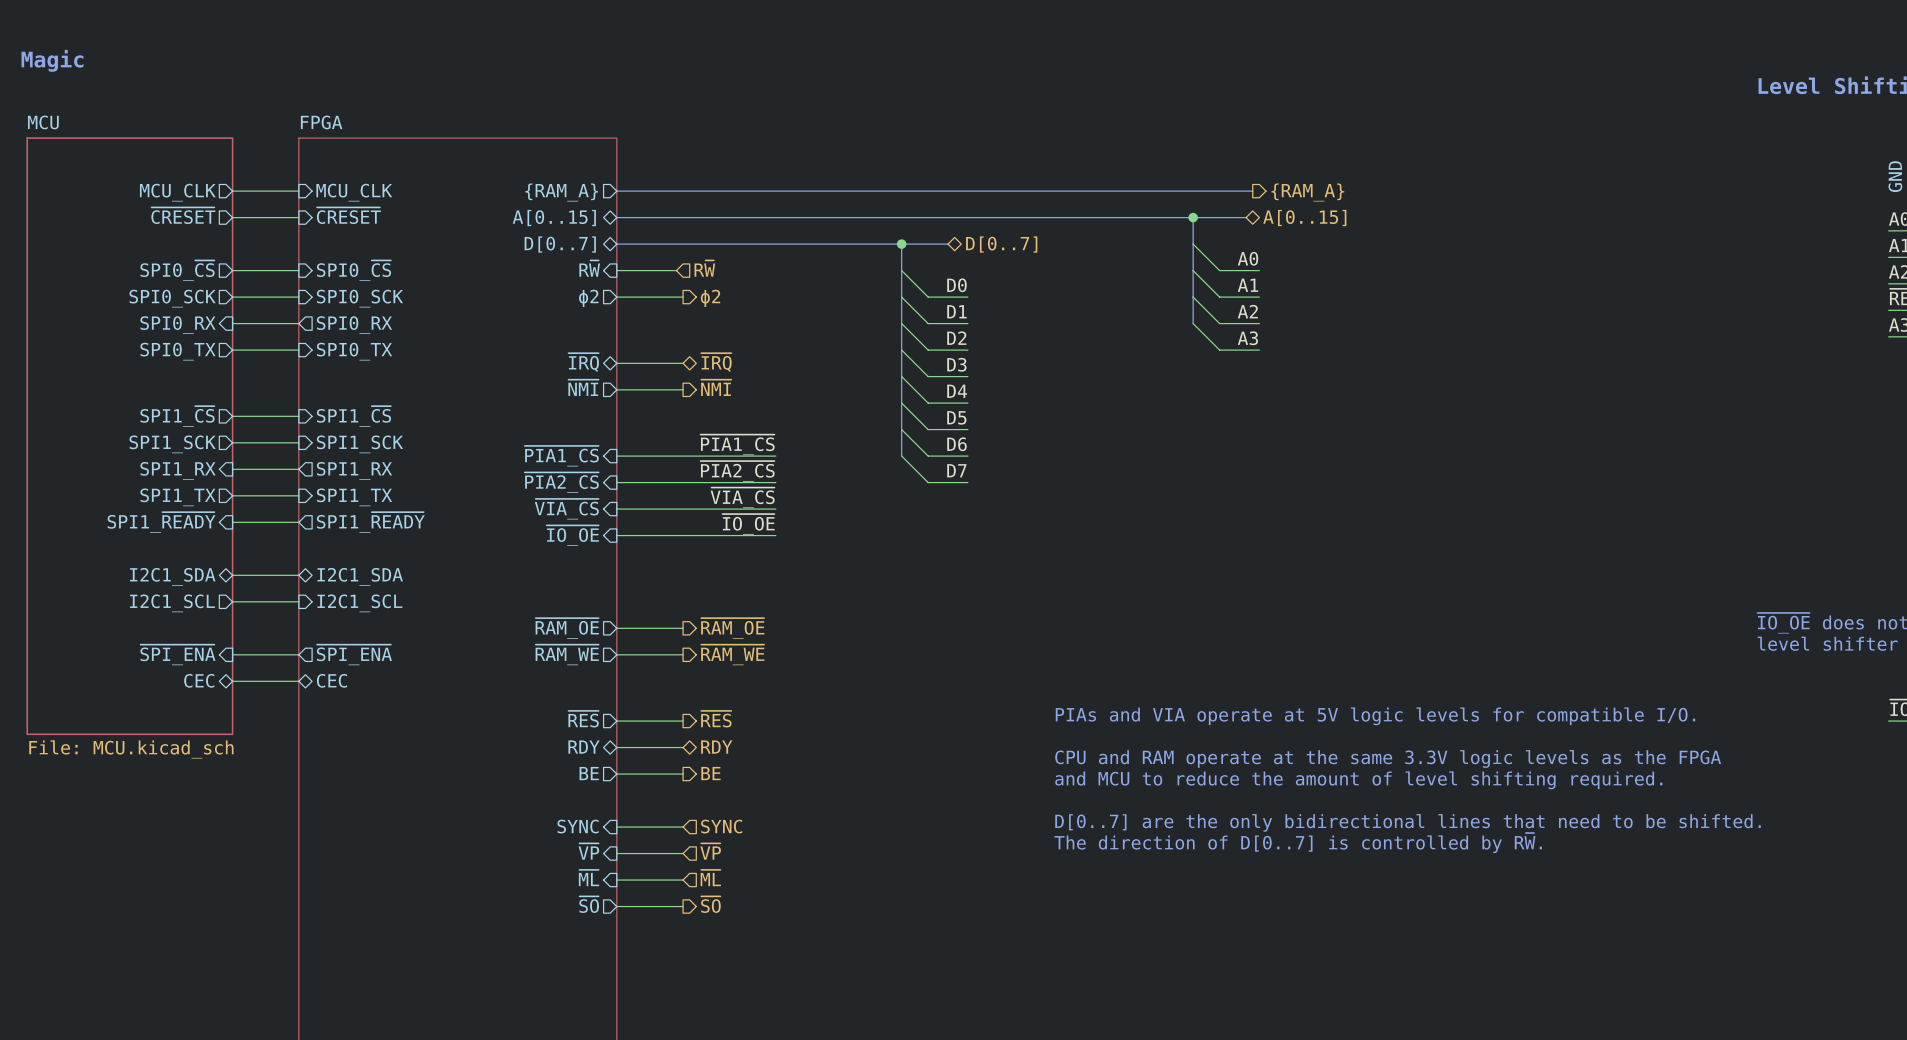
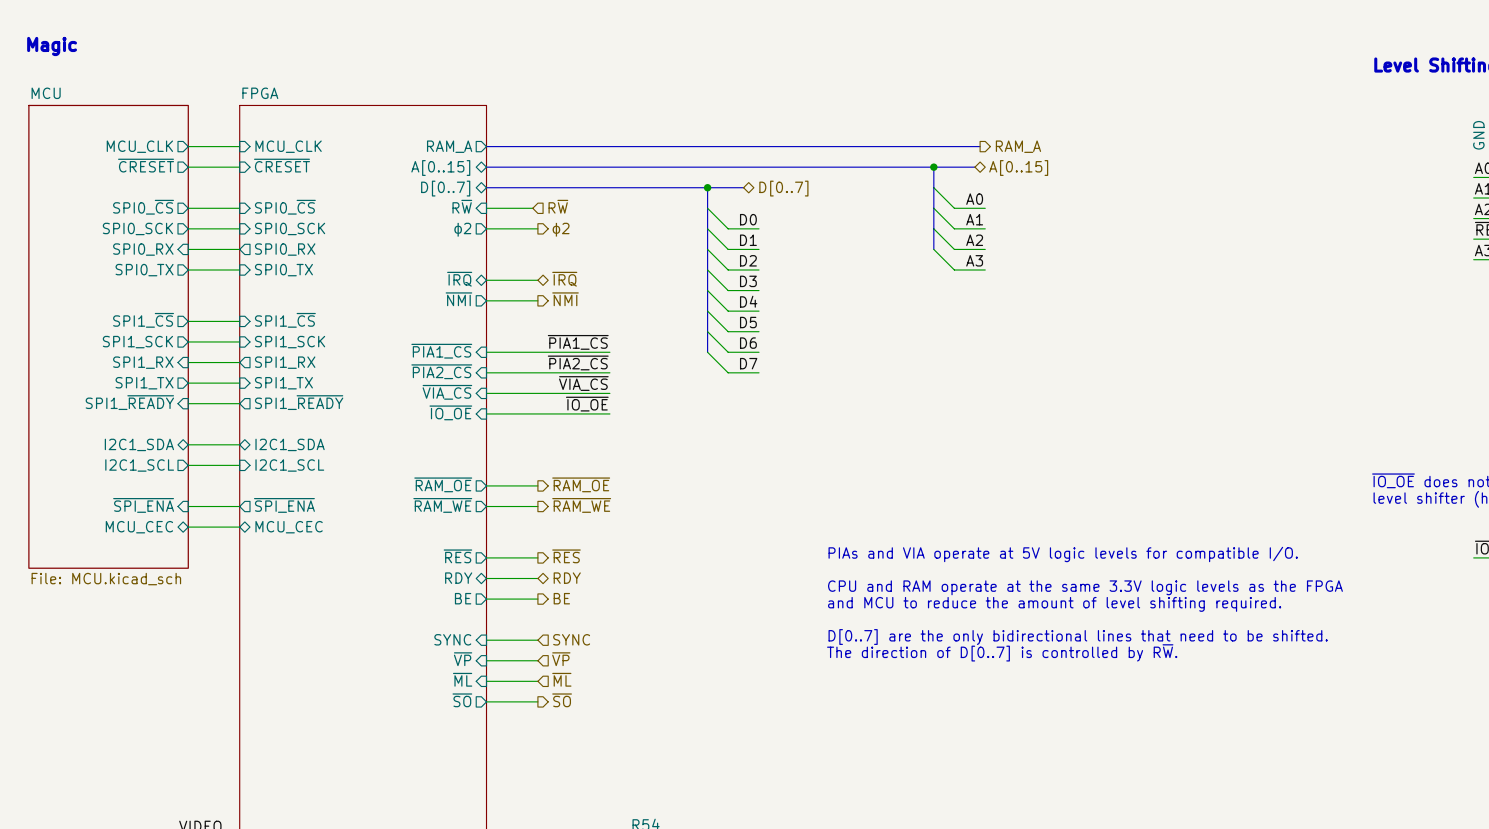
sheet pin: {RAM_A} (561, 192) -> RAM_A (449, 146)
hierarchical label: {RAM_A} (1307, 192) -> RAM_A (1018, 146)
sheet pin: CEC (199, 680) -> MCU_CEC (139, 527)
sheet pin: CEC (331, 680) -> MCU_CEC (289, 527)

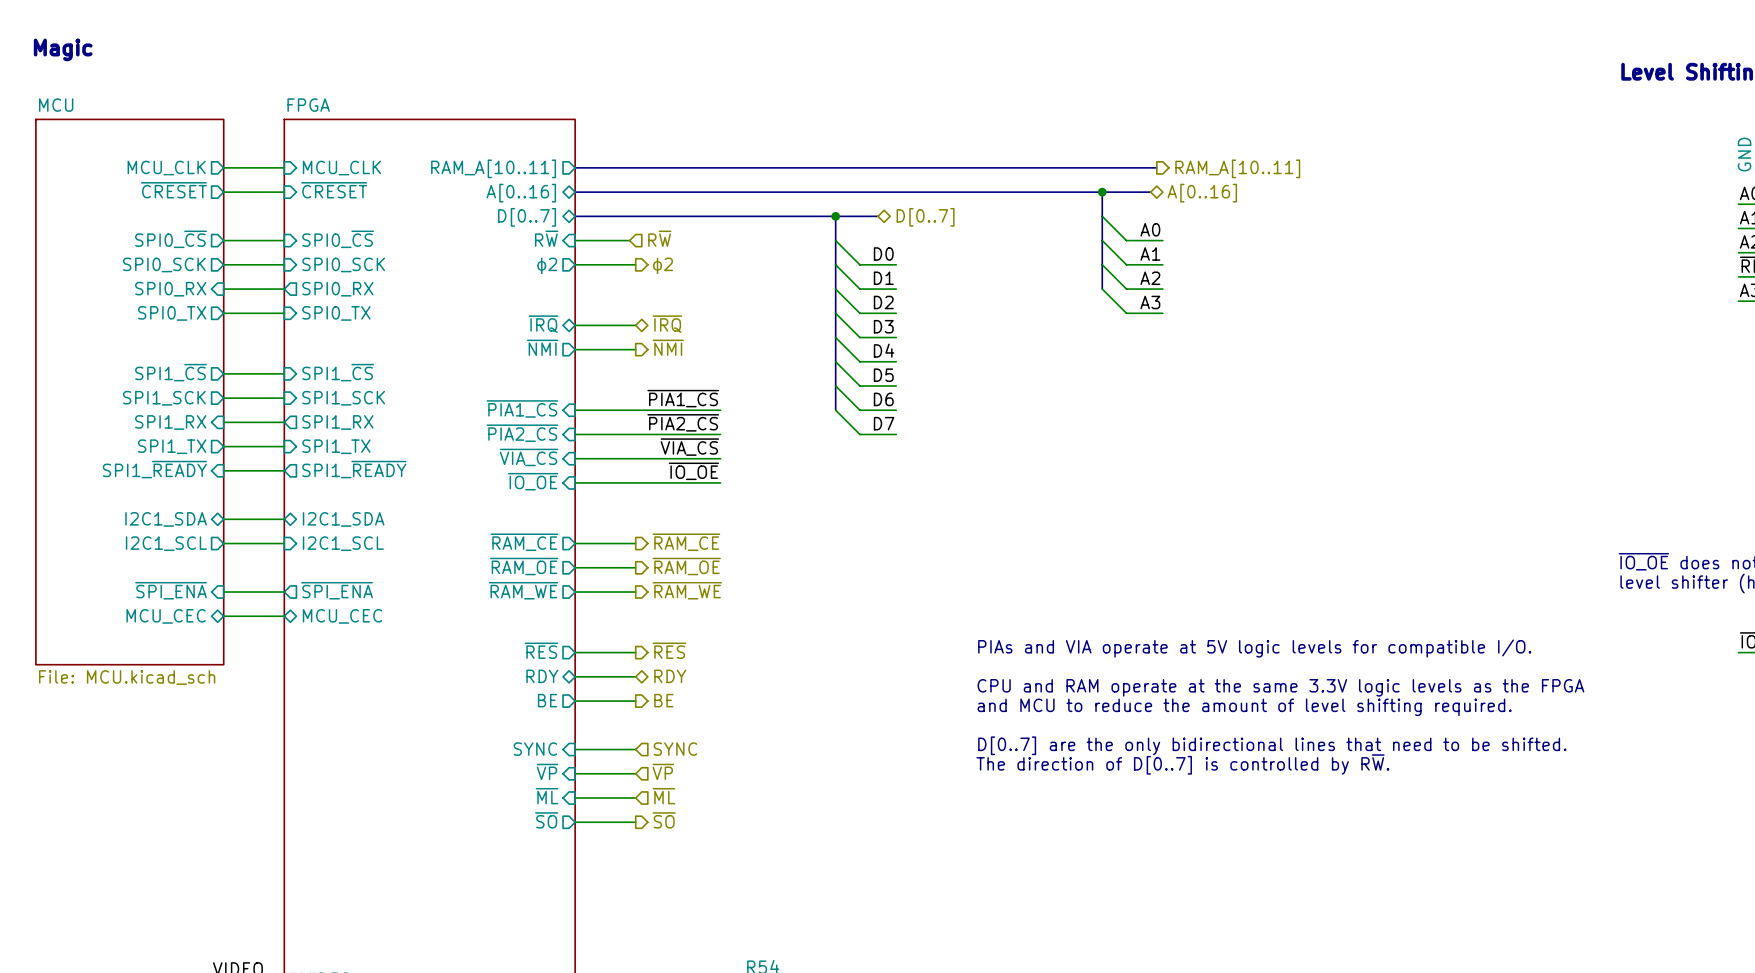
sheet pin: RAM_A (449, 146) -> RAM_A[10..11] (493, 168)
hierarchical label: RAM_A (1018, 146) -> RAM_A[10..11] (1237, 168)
sheet pin: A[0..15] (440, 168) -> A[0..16] (521, 193)
hierarchical label: A[0..15] (1018, 168) -> A[0..16] (1202, 193)
sheet pin: none -> ~{RAM_CE} (524, 542)
hierarchical label: none -> ~{RAM_CE} (686, 542)
wire: none -> (575, 543) (635, 543)

